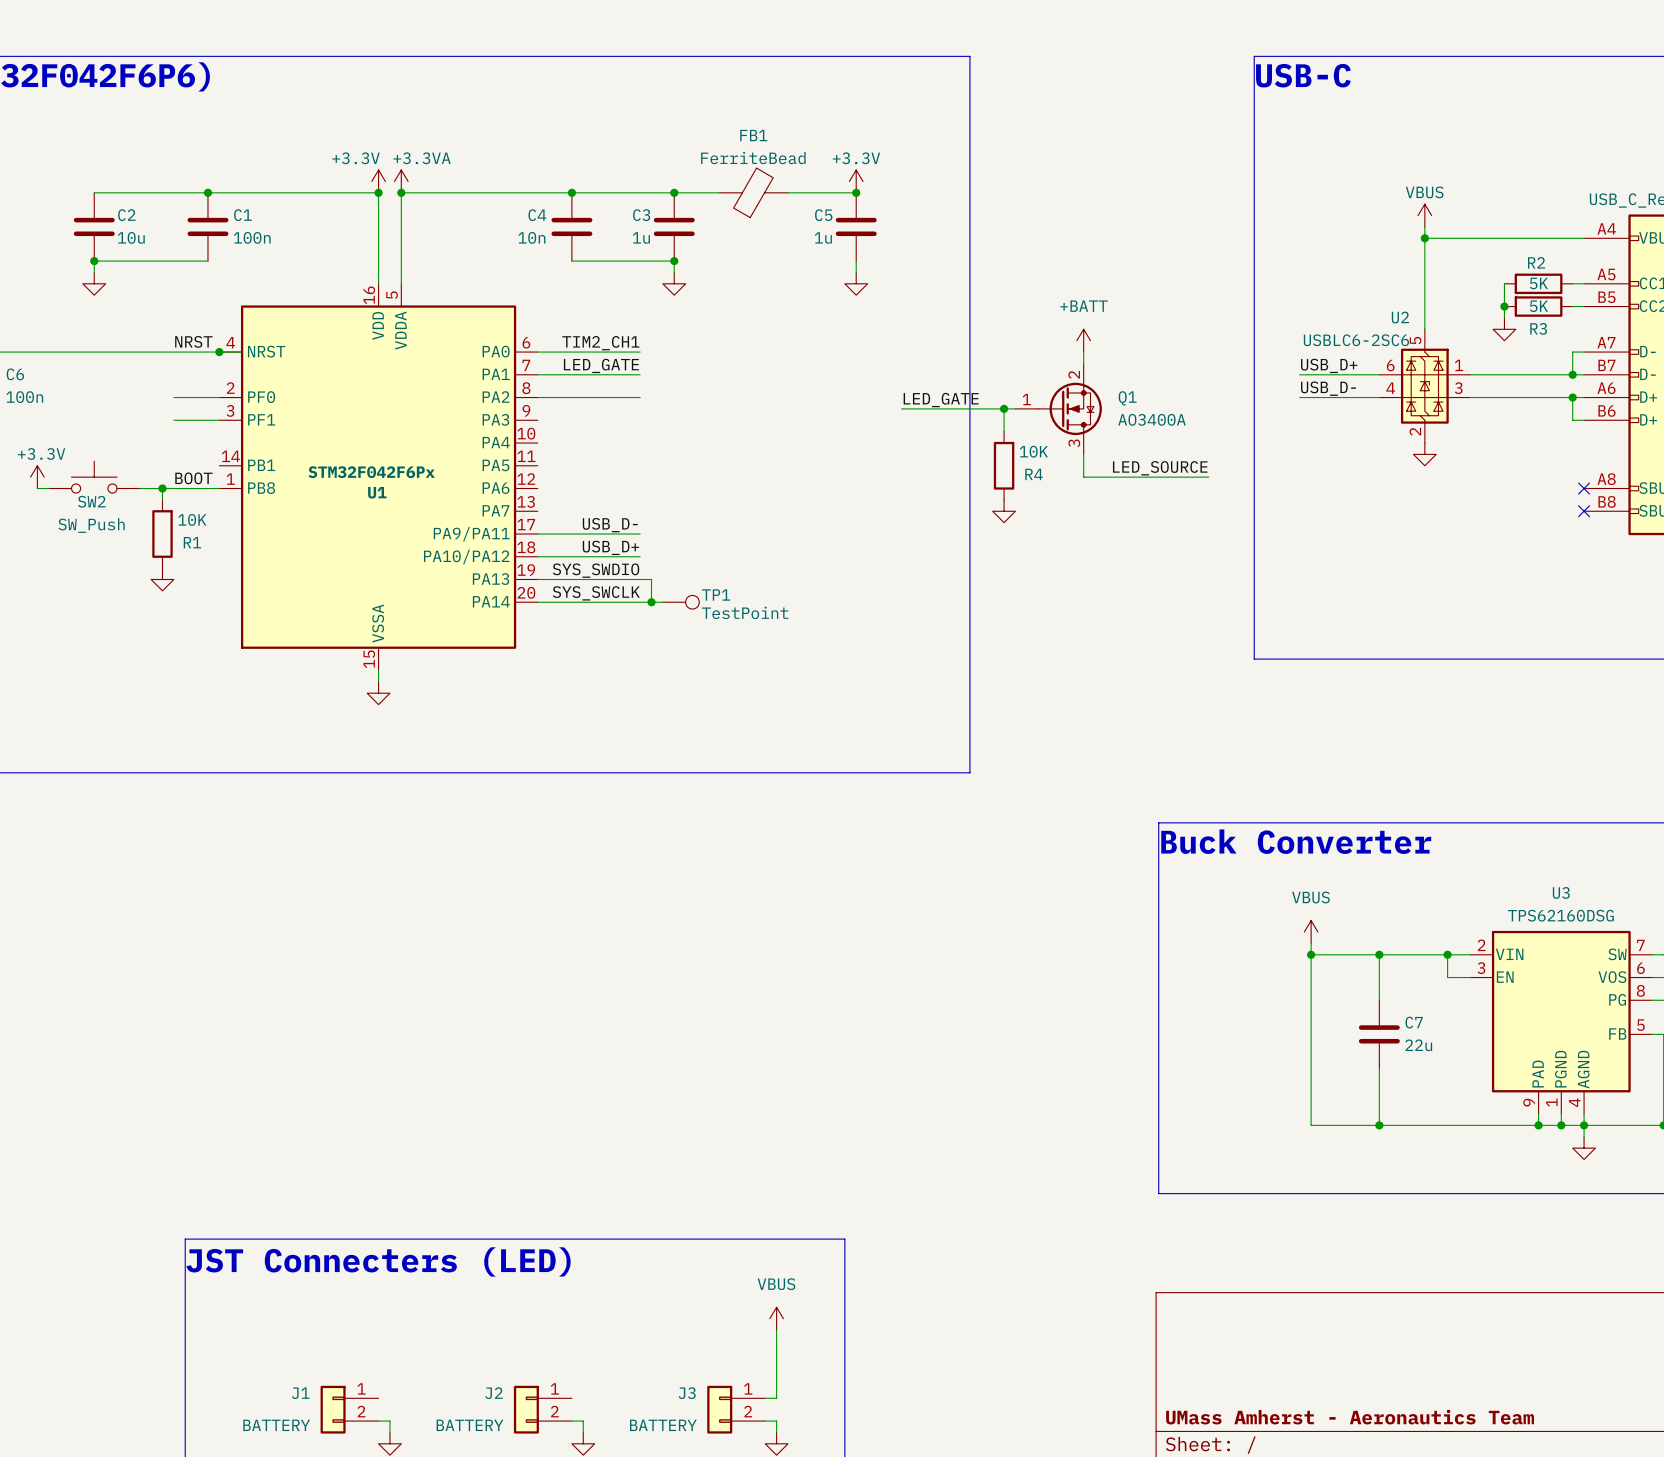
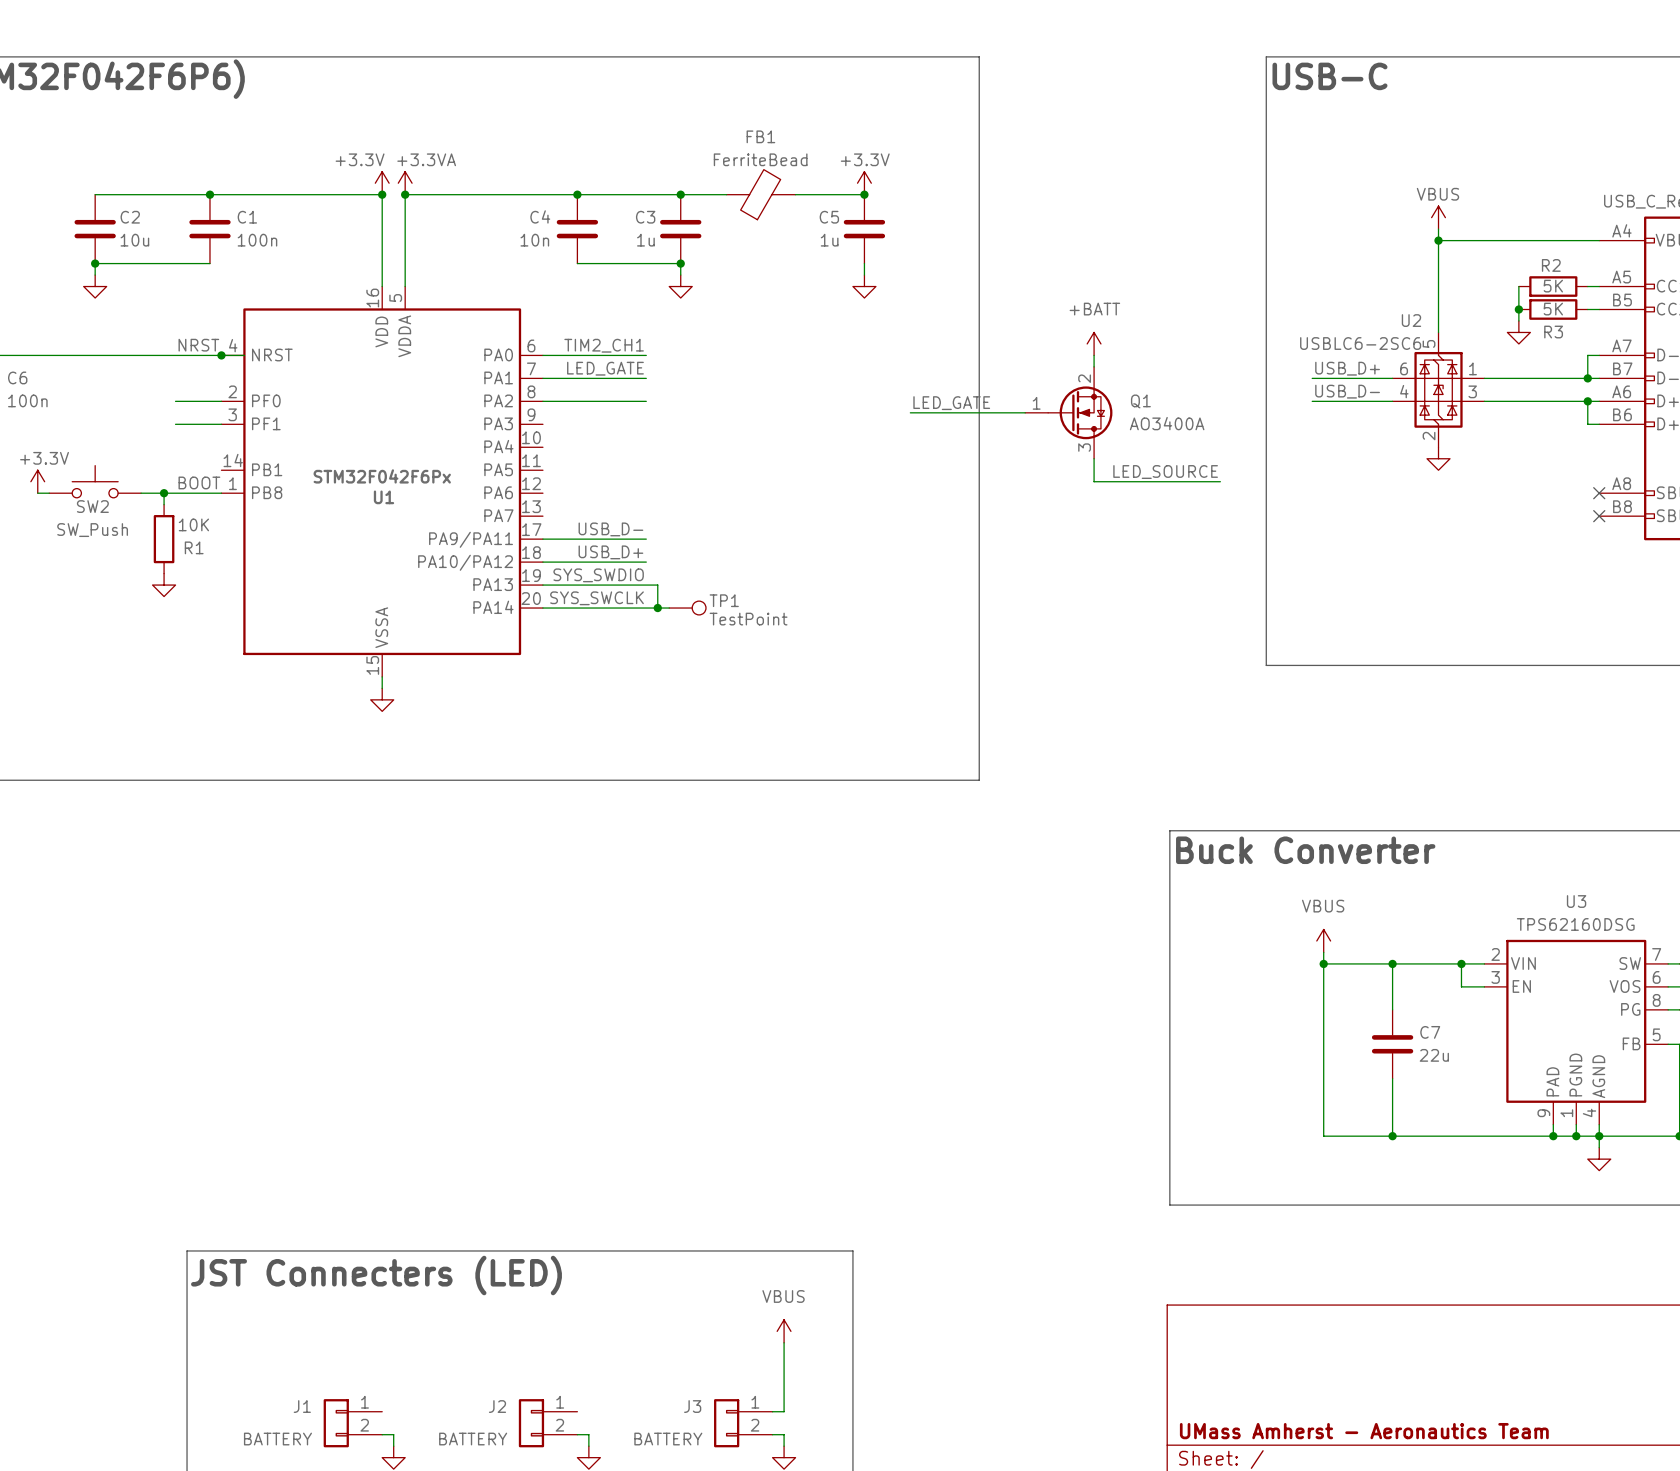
wire: (1004, 408) (1004, 431) -> none
junction: (1004, 408) -> none
R4: 10K (1004, 465) -> none
power symbol: (1004, 511) -> none

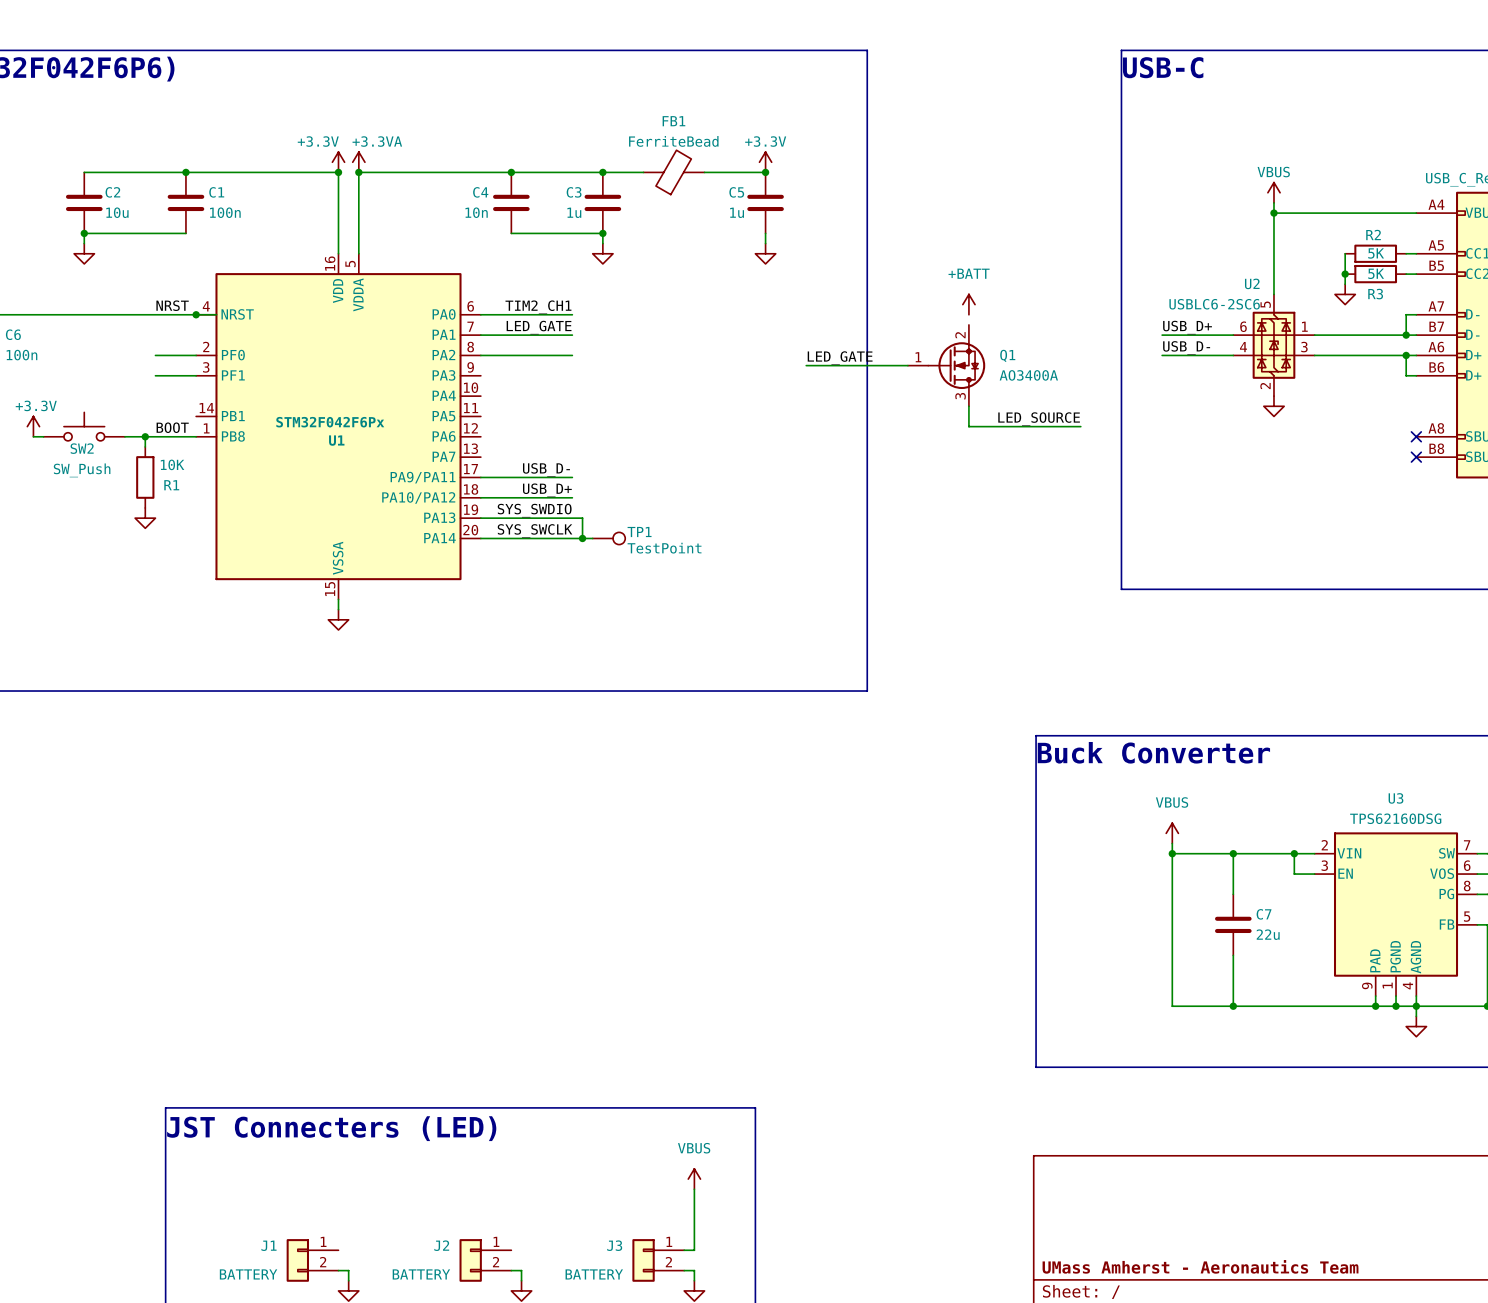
wire: (1094, 355) (1094, 366) -> none

